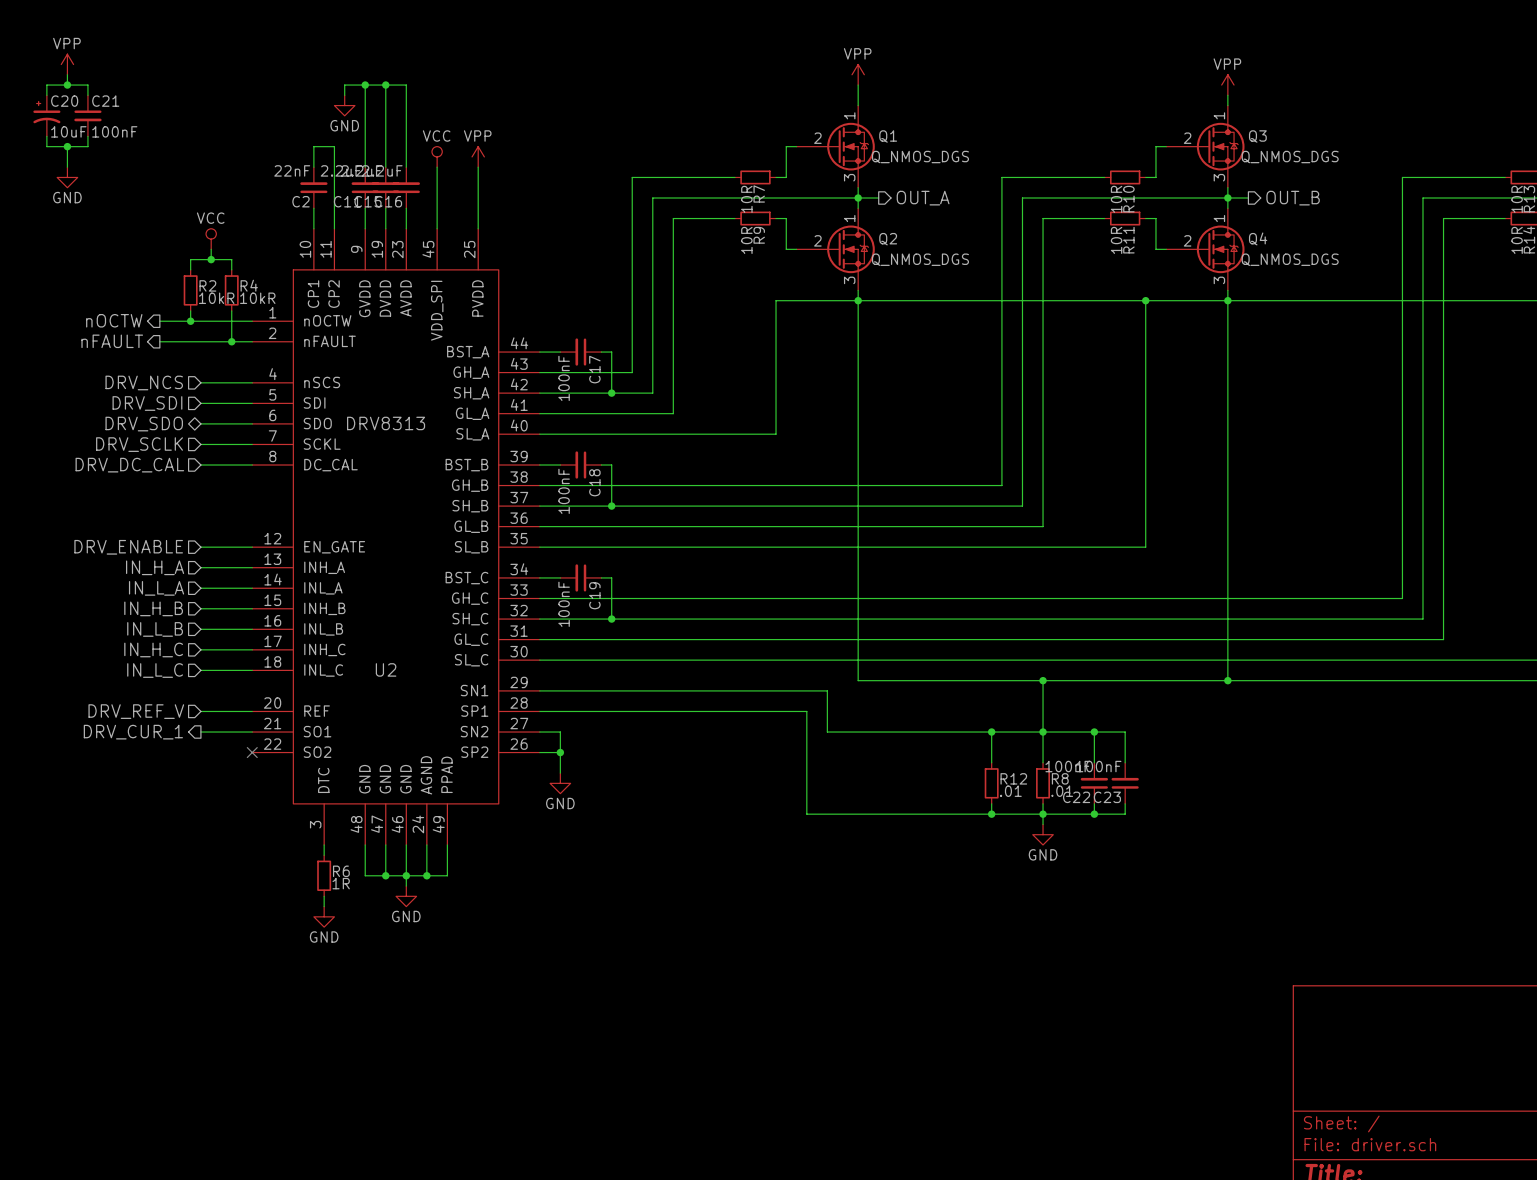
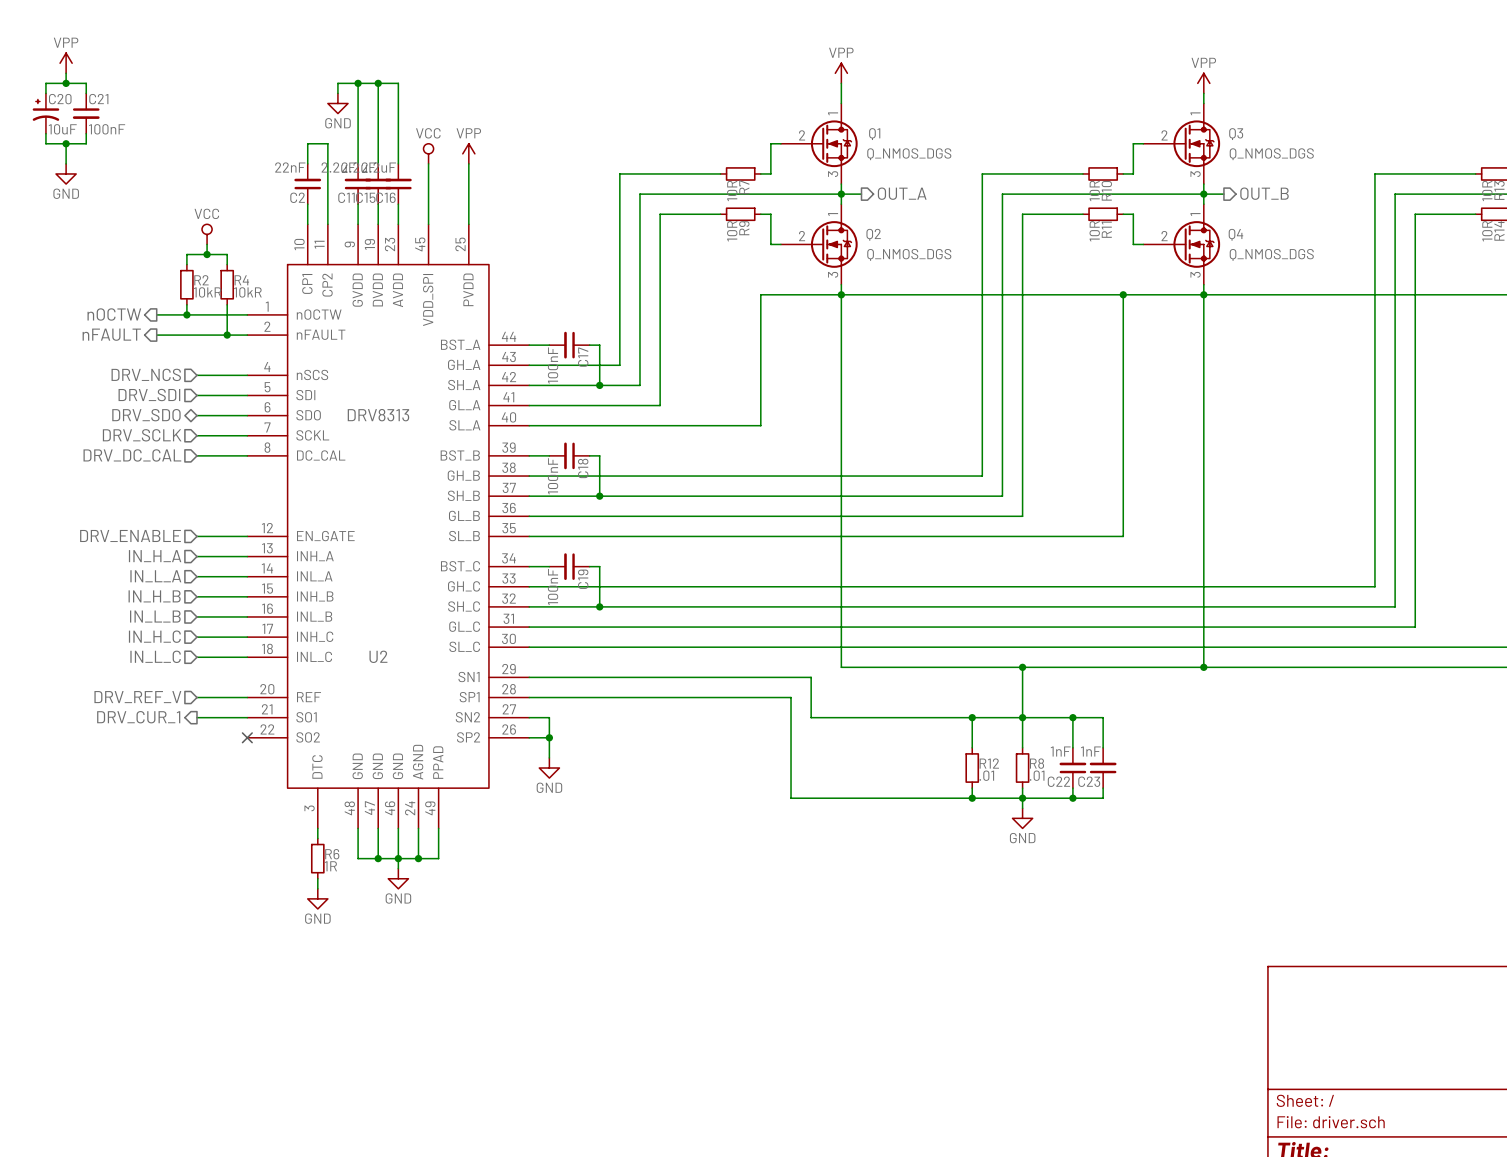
C22 value: 100nF (1068, 766) -> 1nF (1060, 751)
C23 value: 100nF (1098, 766) -> 1nF (1090, 751)

